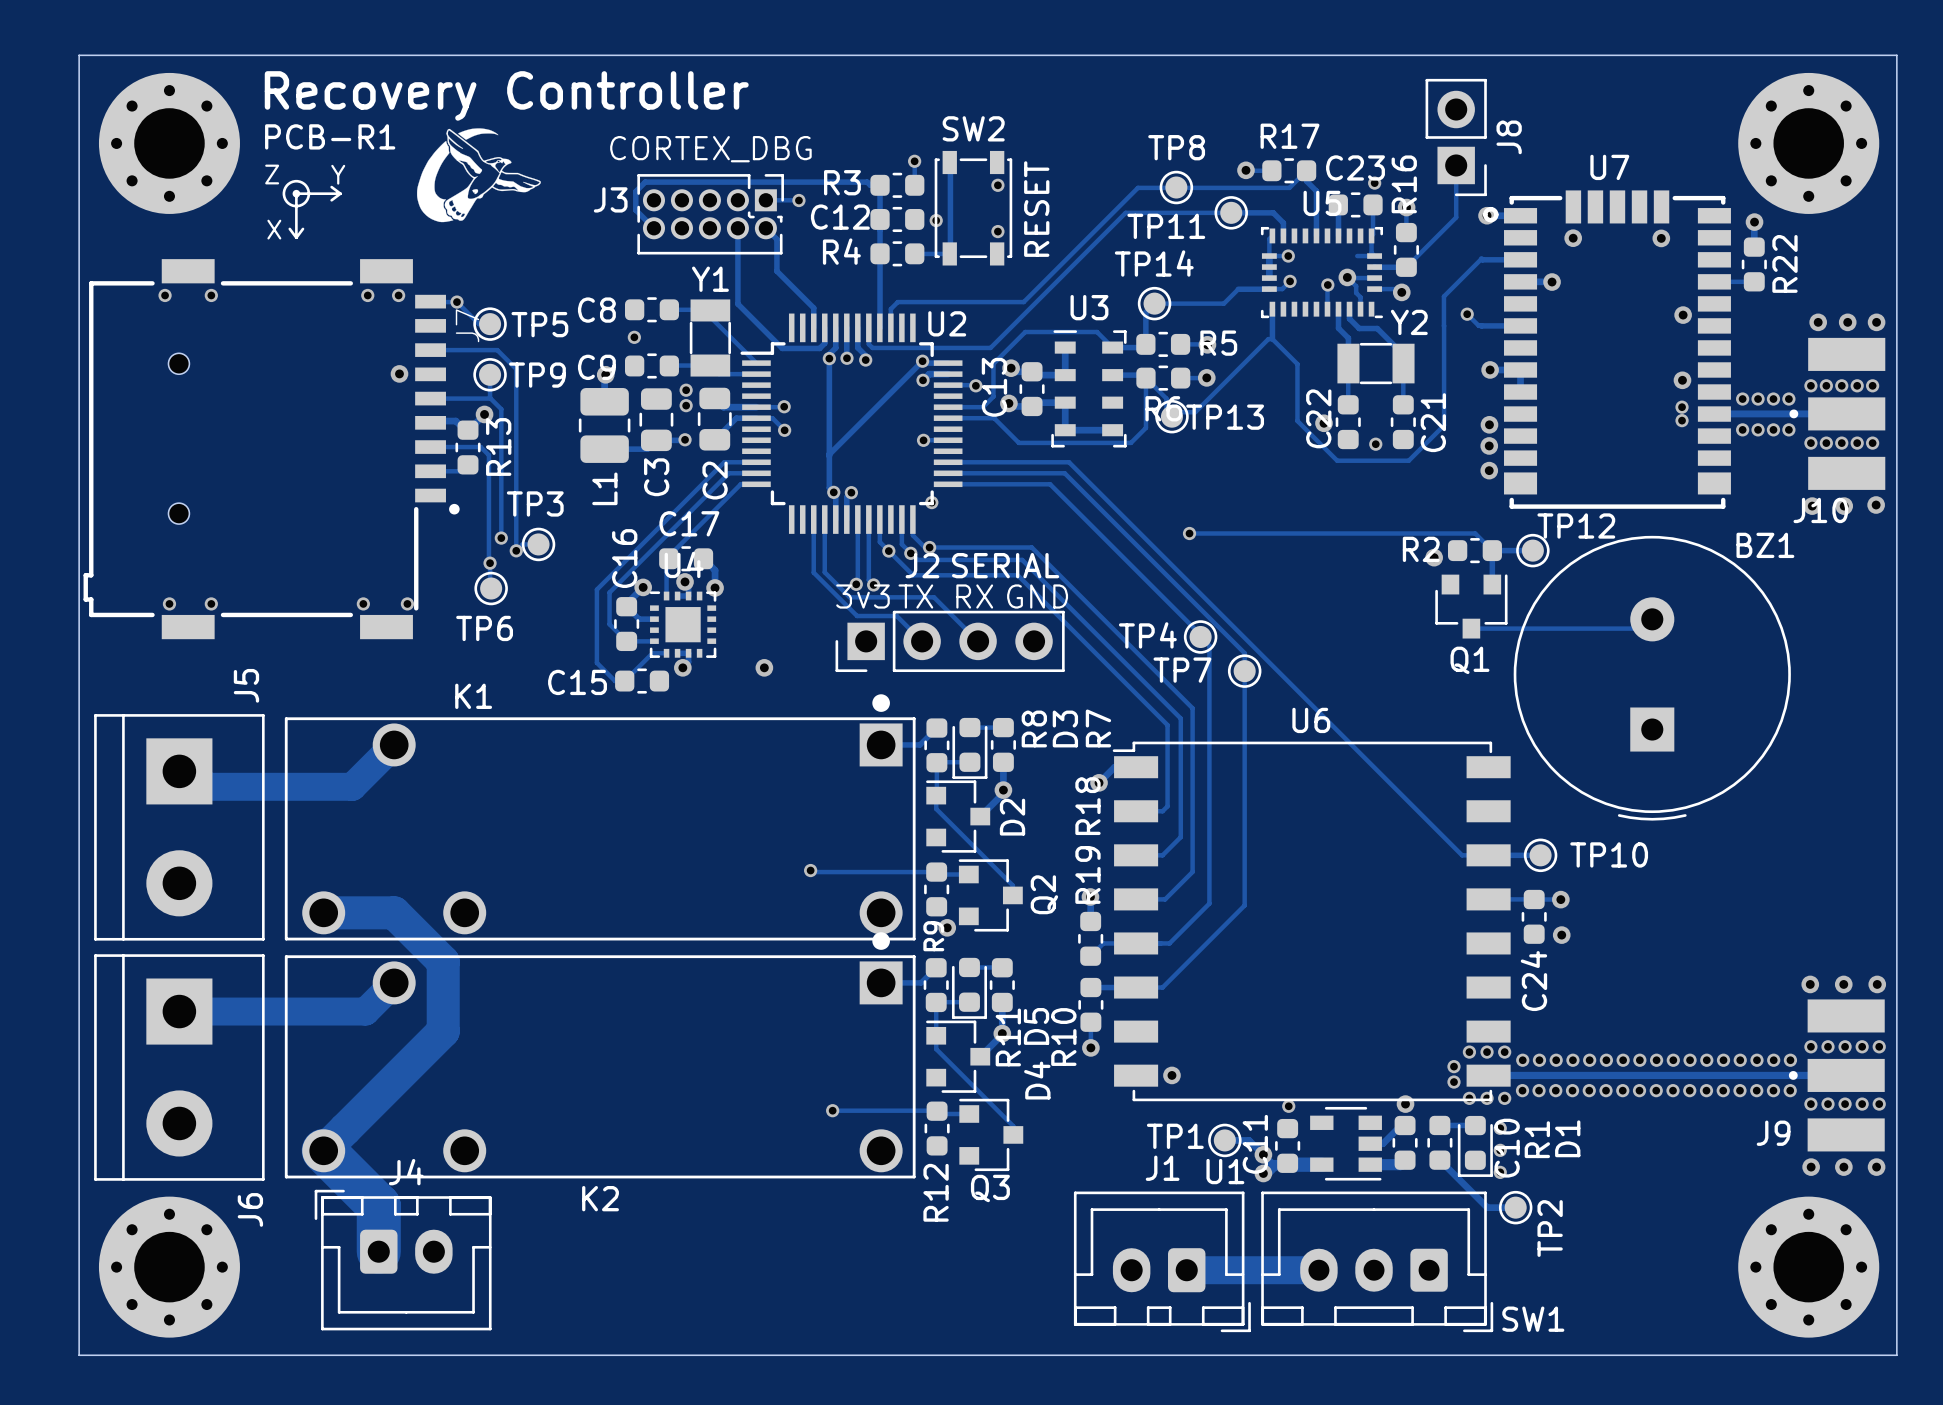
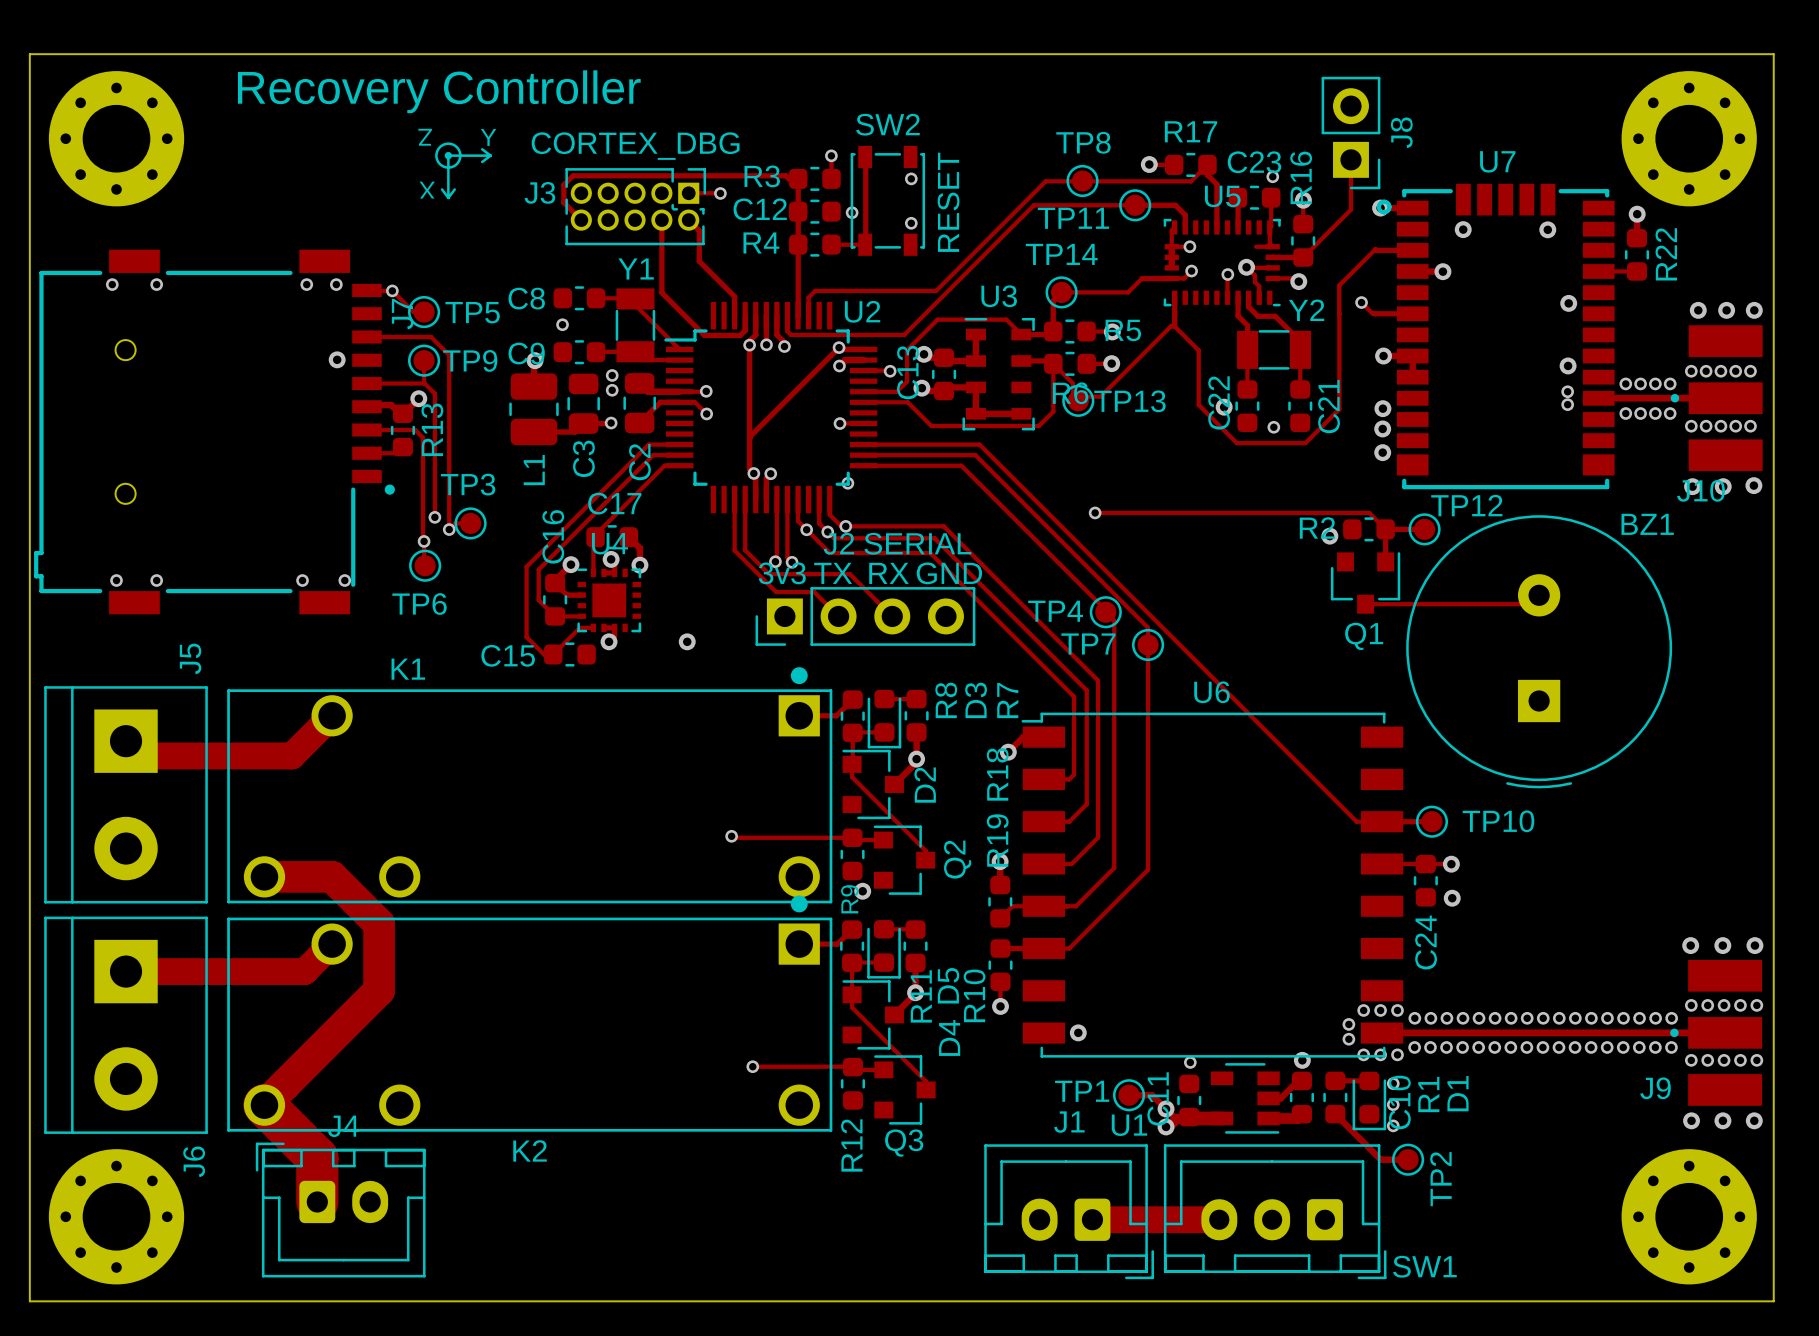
drawing: [417, 128, 541, 223] -> none
text: PCB-R1 (330, 136) -> none
text position: Z (272, 174) -> Z (425, 137)
text position: Y (338, 174) -> Y (488, 137)
line: (331, 187) (340, 193) -> (482, 149) (490, 155)
drawing position: (296, 193) -> (448, 155)
drawing position: (296, 193) -> (448, 155)
line: (340, 193) (296, 193) (296, 237) -> (490, 155) (448, 155) (448, 197)
line: (340, 193) (331, 200) -> (490, 155) (482, 161)
line: (289, 228) (296, 237) -> (442, 189) (448, 197)
line: (302, 228) (296, 237) -> (454, 189) (448, 197)
text position: X (274, 229) -> X (427, 190)

